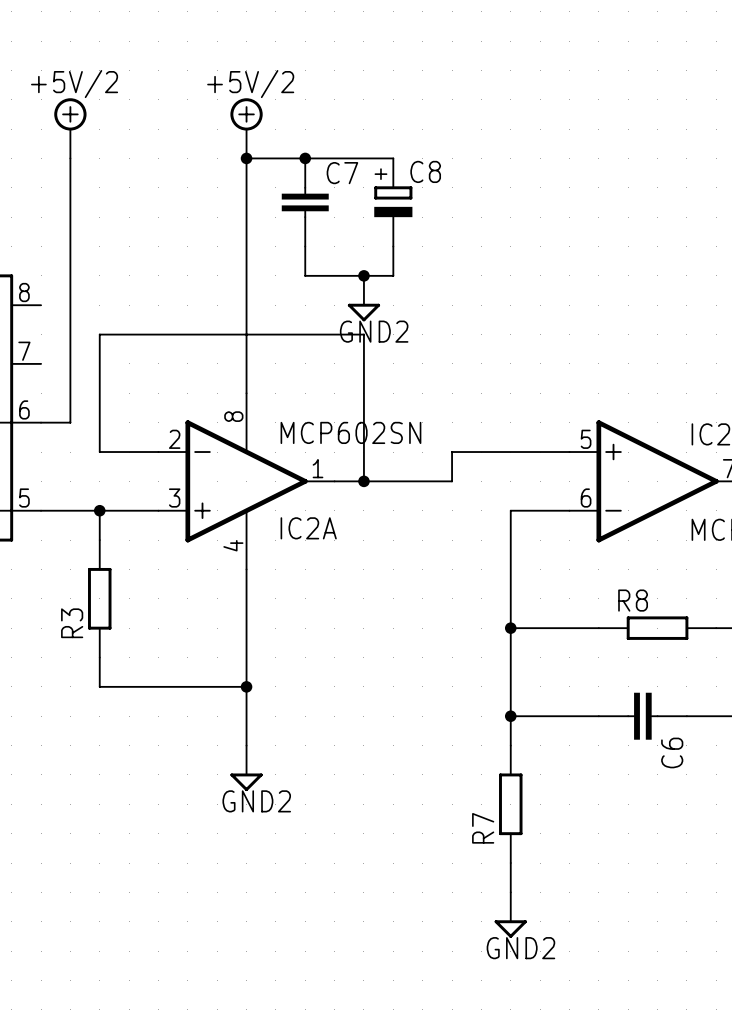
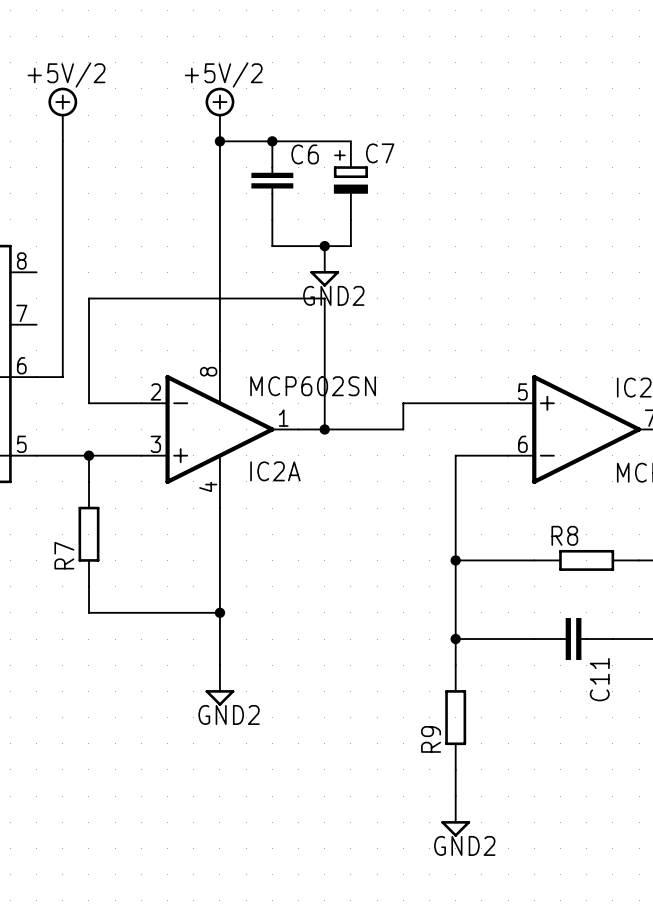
C8 name: C8 (425, 171) -> C7 (380, 153)
C7 name: C7 (342, 173) -> C6 (305, 154)
R3 name: R3 (72, 623) -> R7 (64, 555)
C6 name: C6 (672, 752) -> C11 (599, 679)
R7 name: R7 (483, 828) -> R9 (431, 739)

